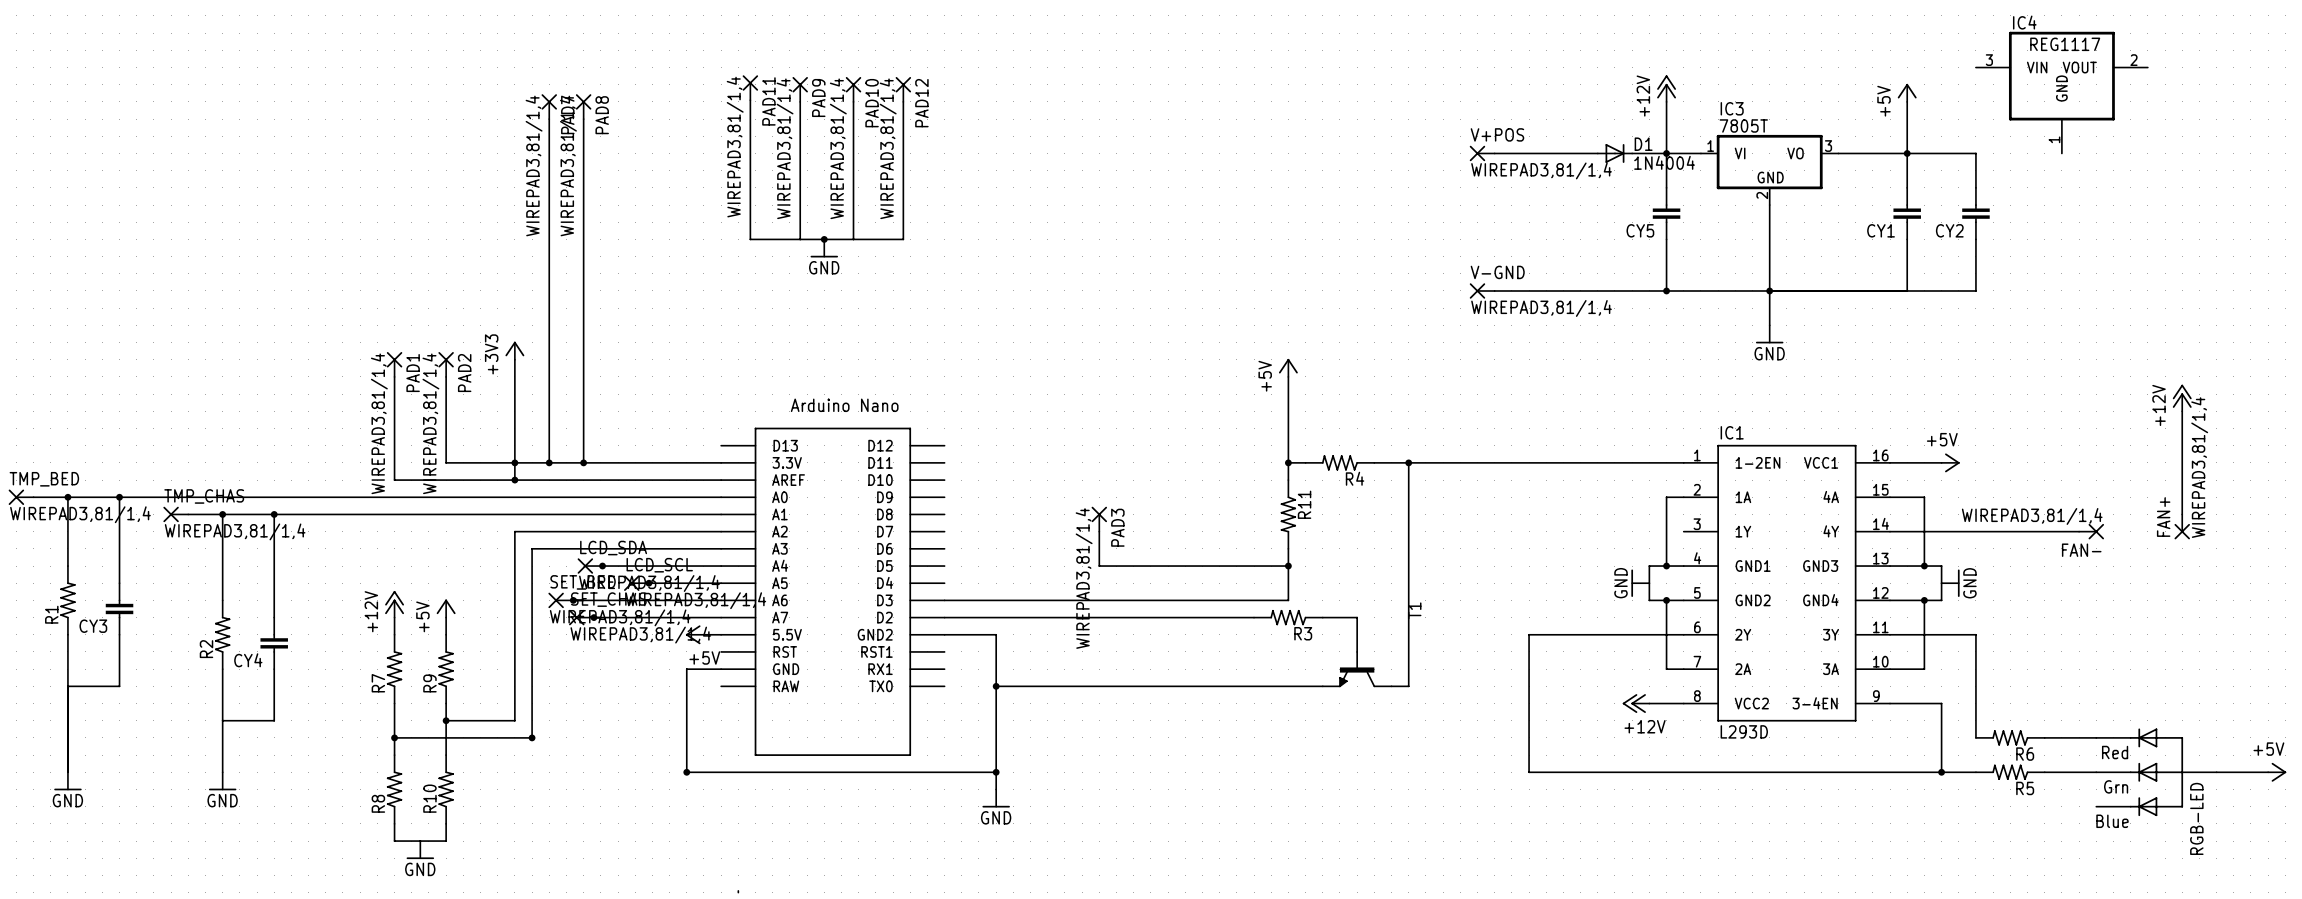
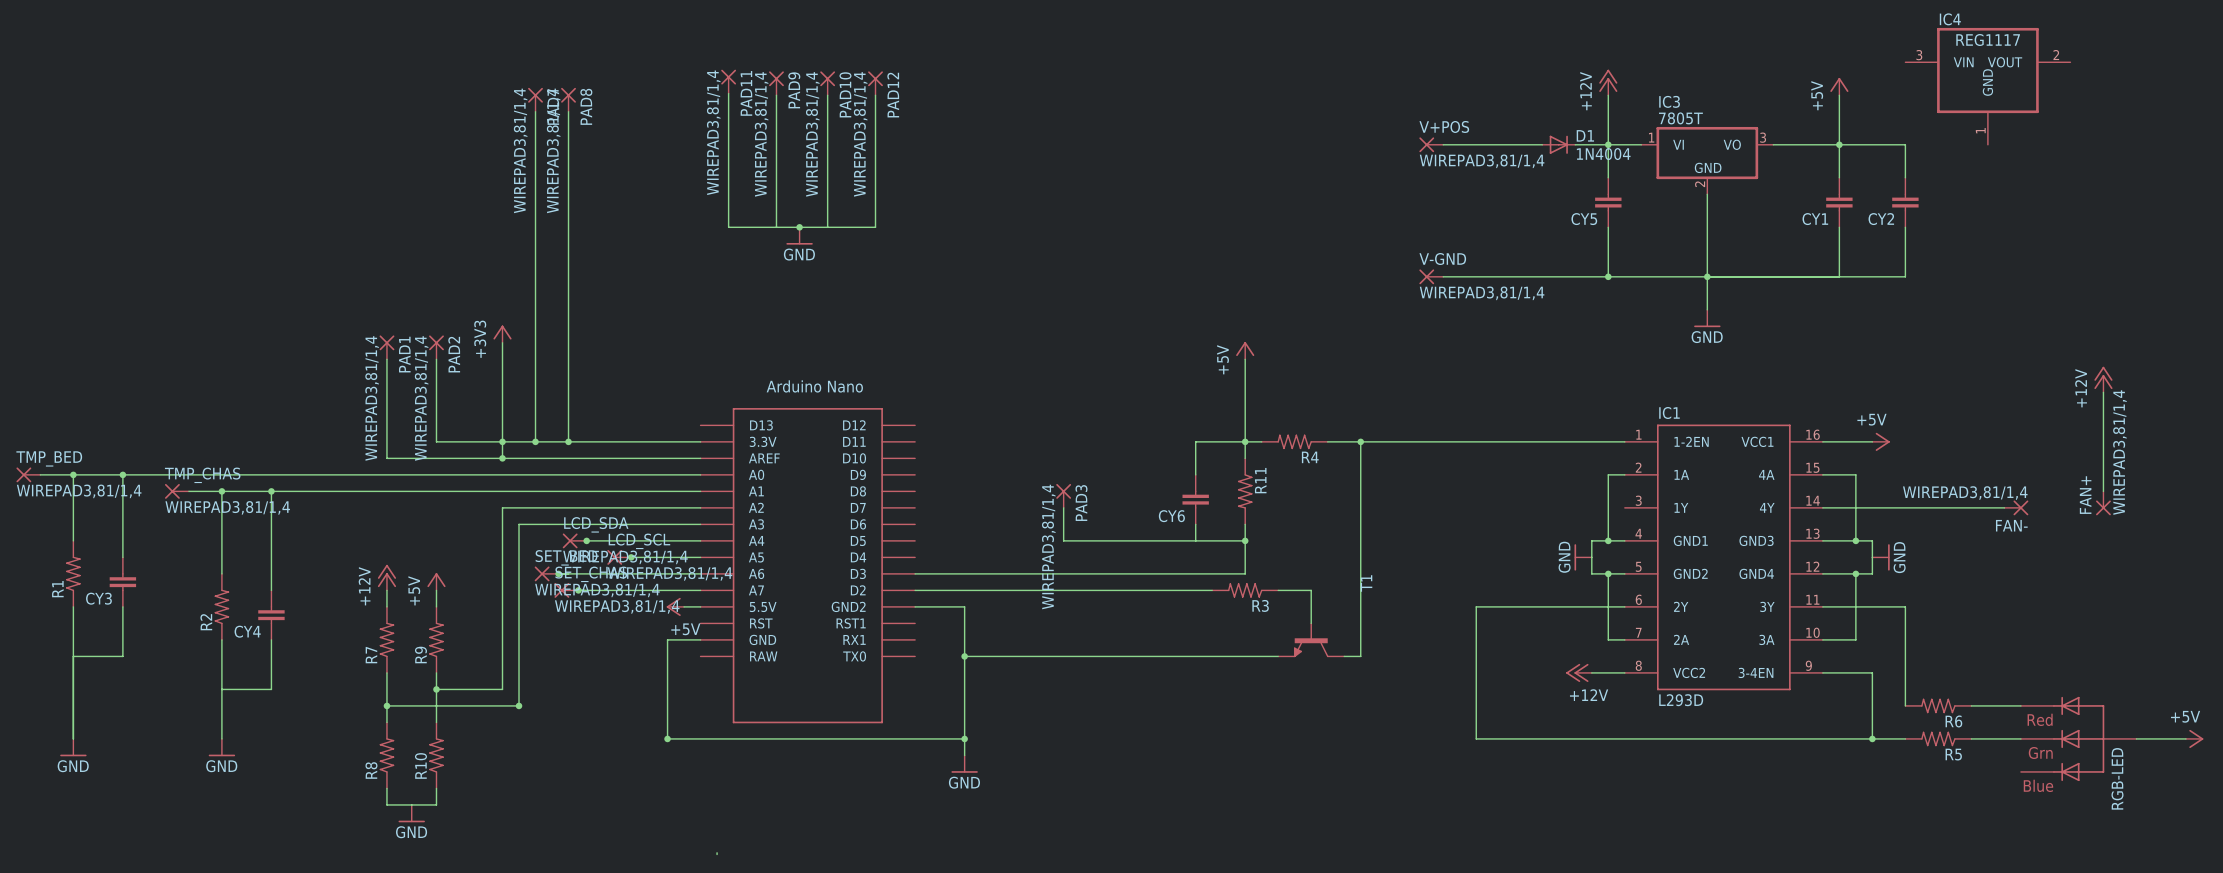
wire: none -> (1245, 441) (1195, 441) (1195, 474)
CY6: none -> (1195, 499)
wire: none -> (1195, 524) (1195, 540)

